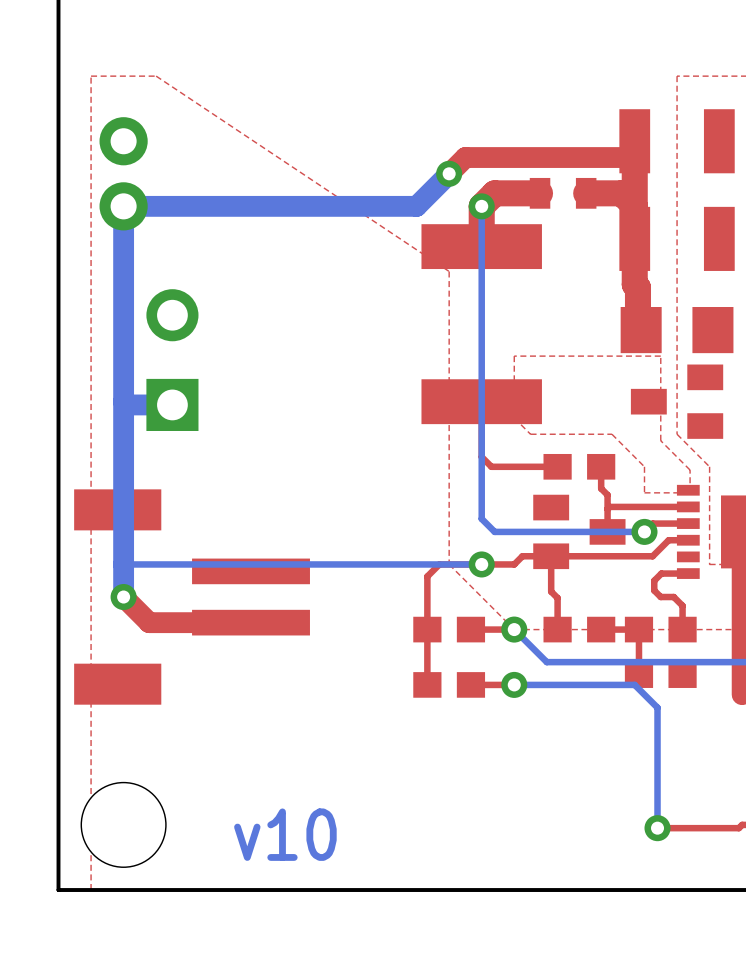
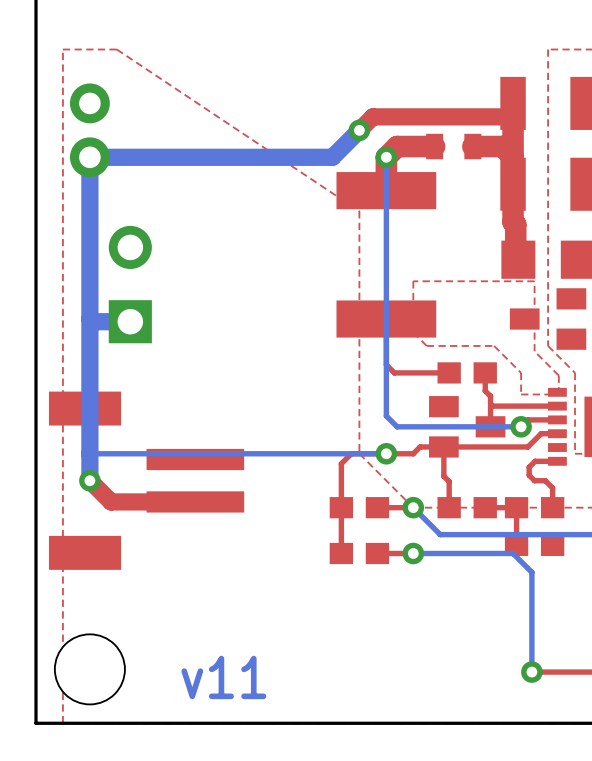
text: v10 (285, 834) -> v11 (223, 677)

